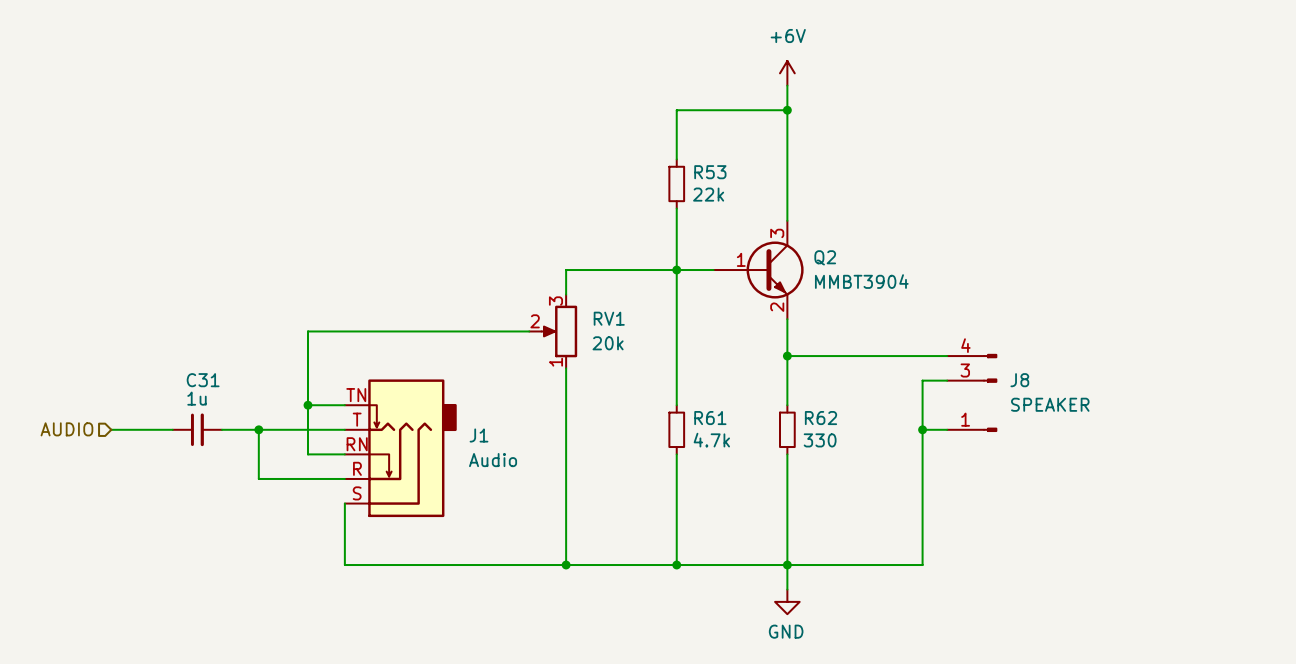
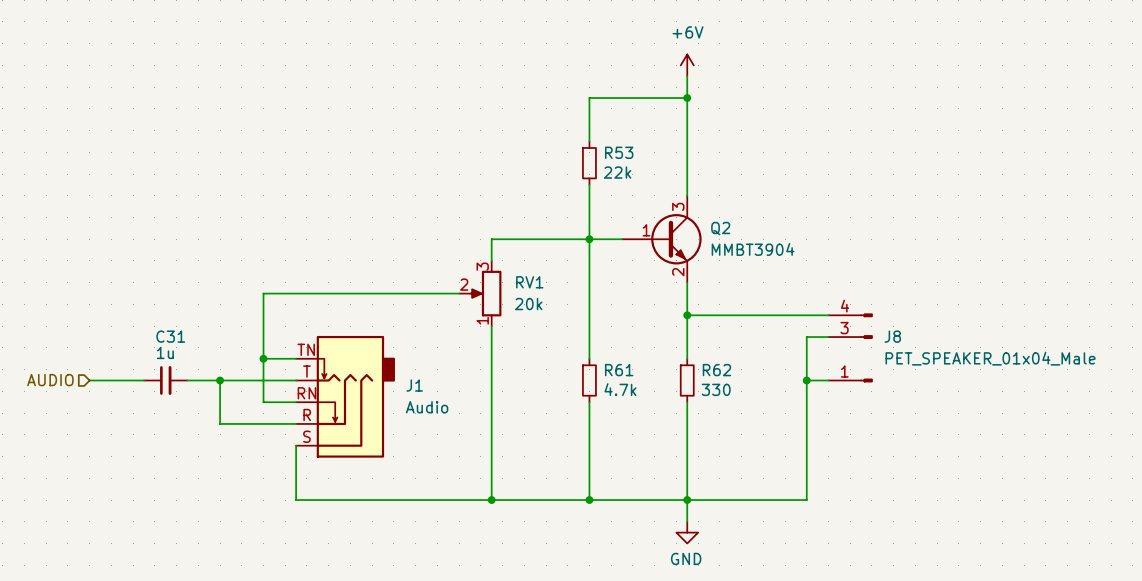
J8 value: SPEAKER (1050, 404) -> PET_SPEAKER_01x04_Male (990, 358)

